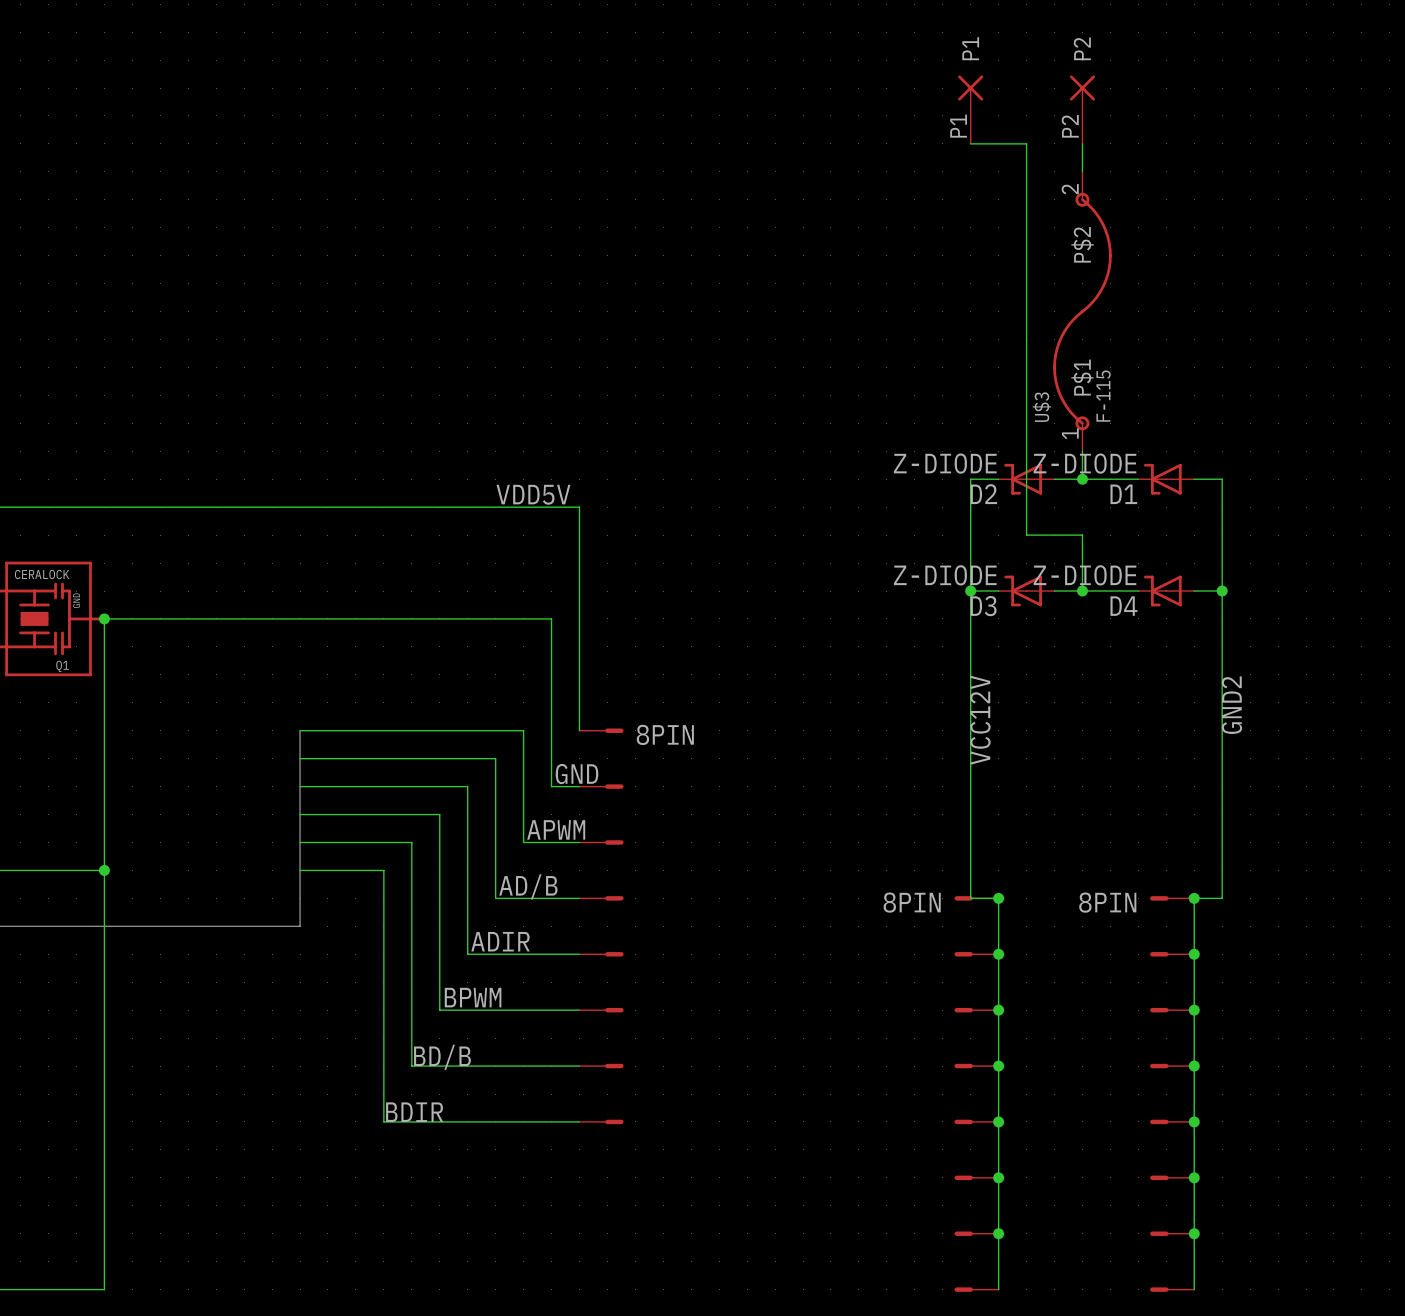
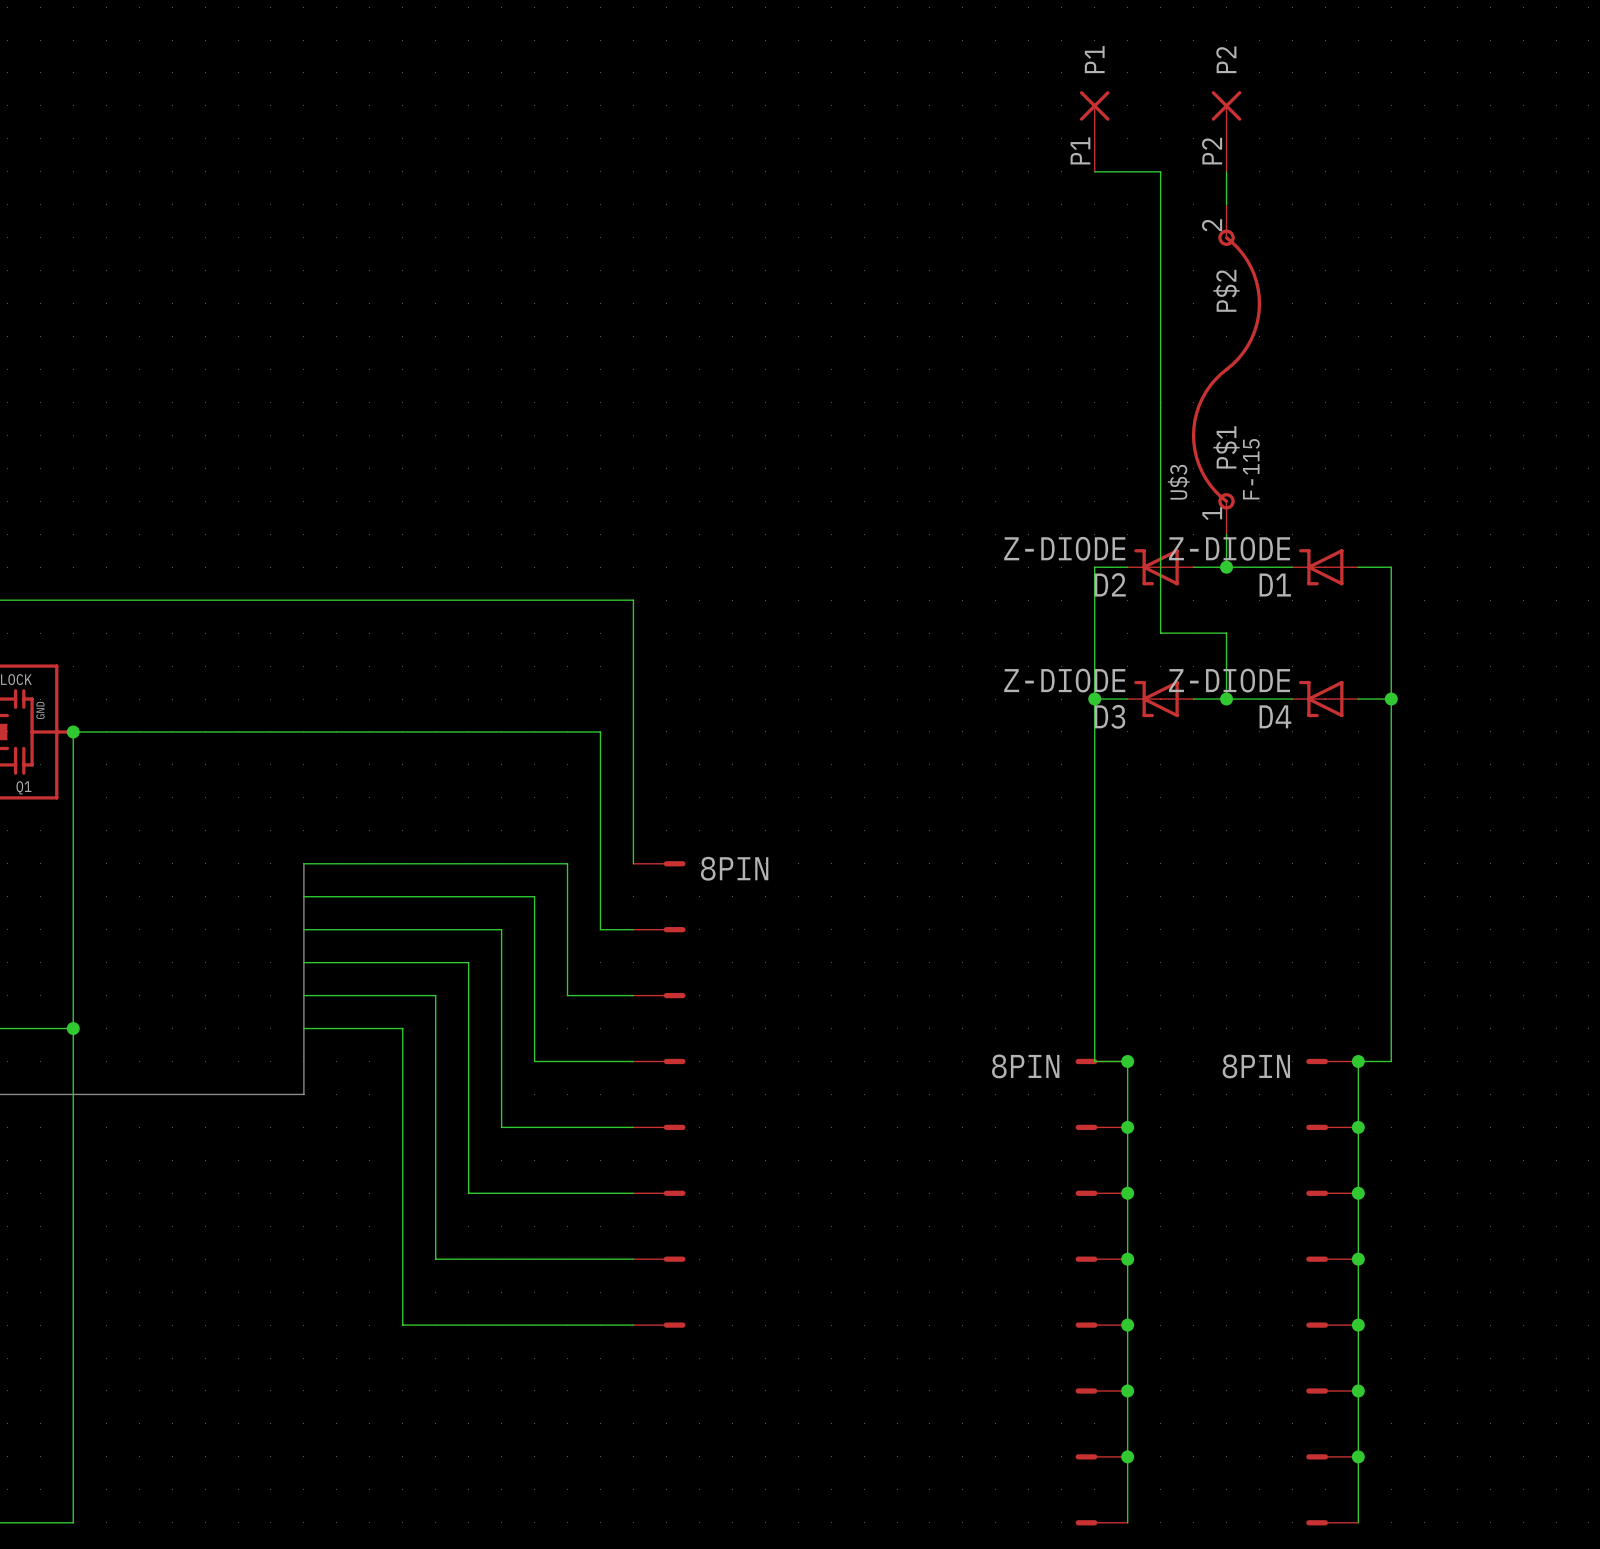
label: VDD5V (533, 494) -> none
label: GND2 (1231, 705) -> none
label: VCC12V (980, 720) -> none
label: GND (577, 774) -> none
label: APWM (556, 829) -> none
label: AD/B (528, 886) -> none
label: ADIR (500, 941) -> none
label: BPWM (473, 997) -> none
label: BD/B (442, 1057) -> none
label: BDIR (414, 1112) -> none

